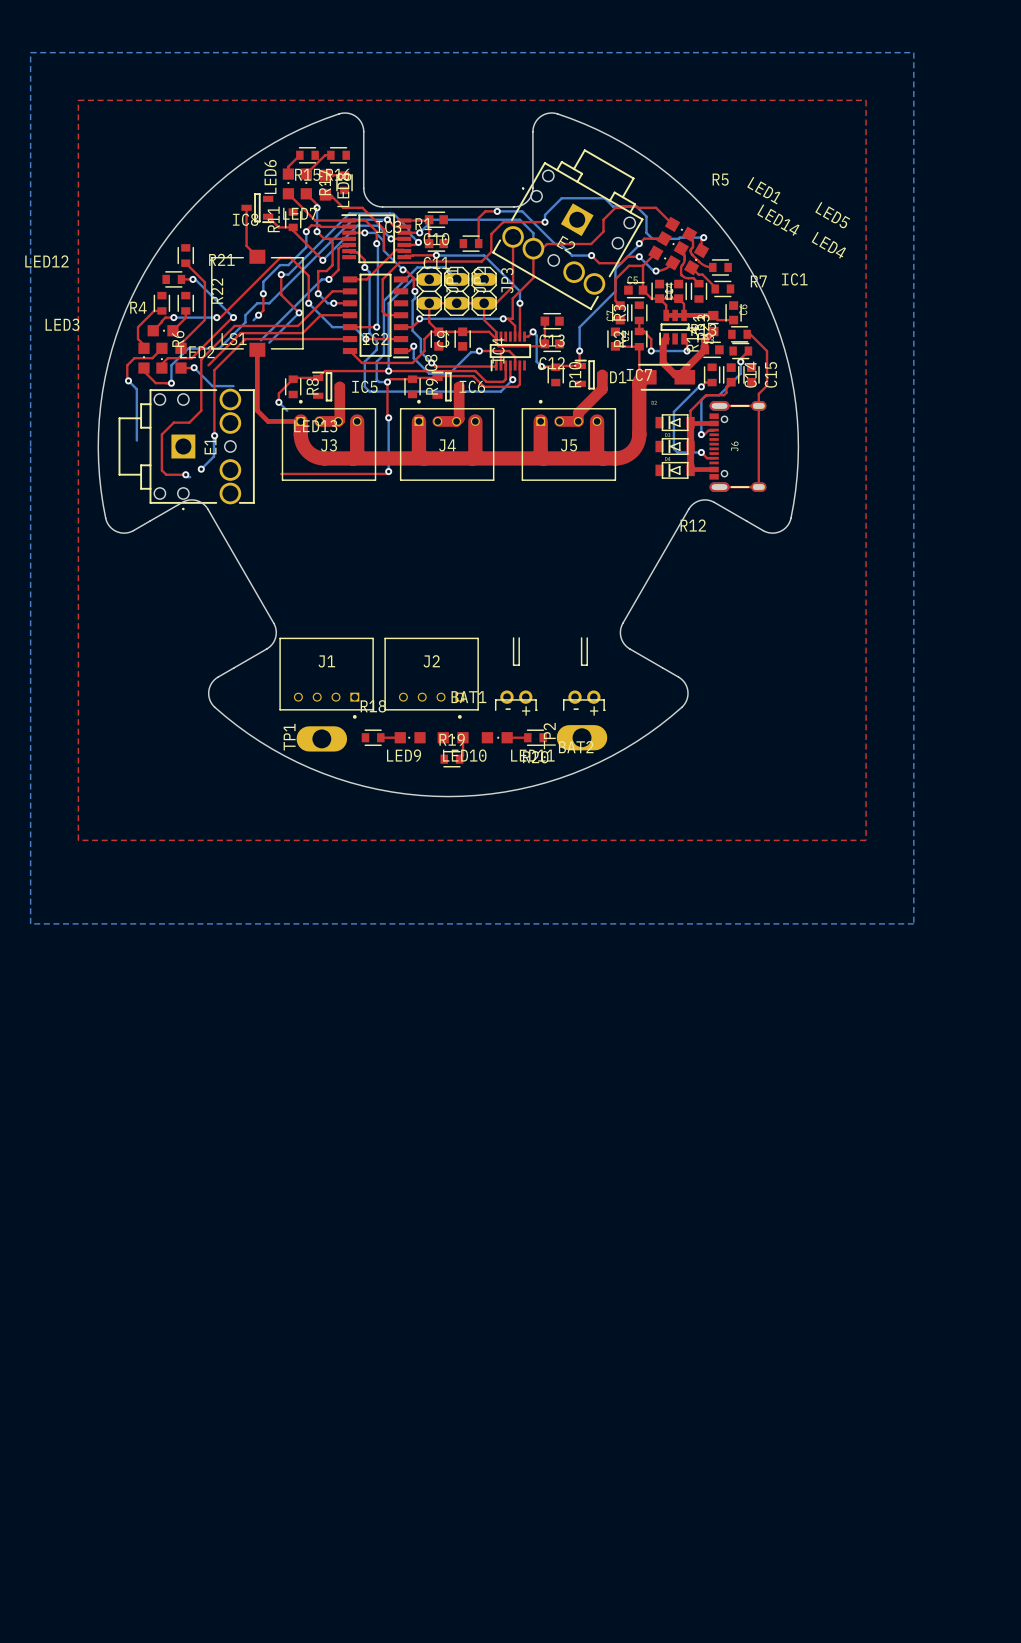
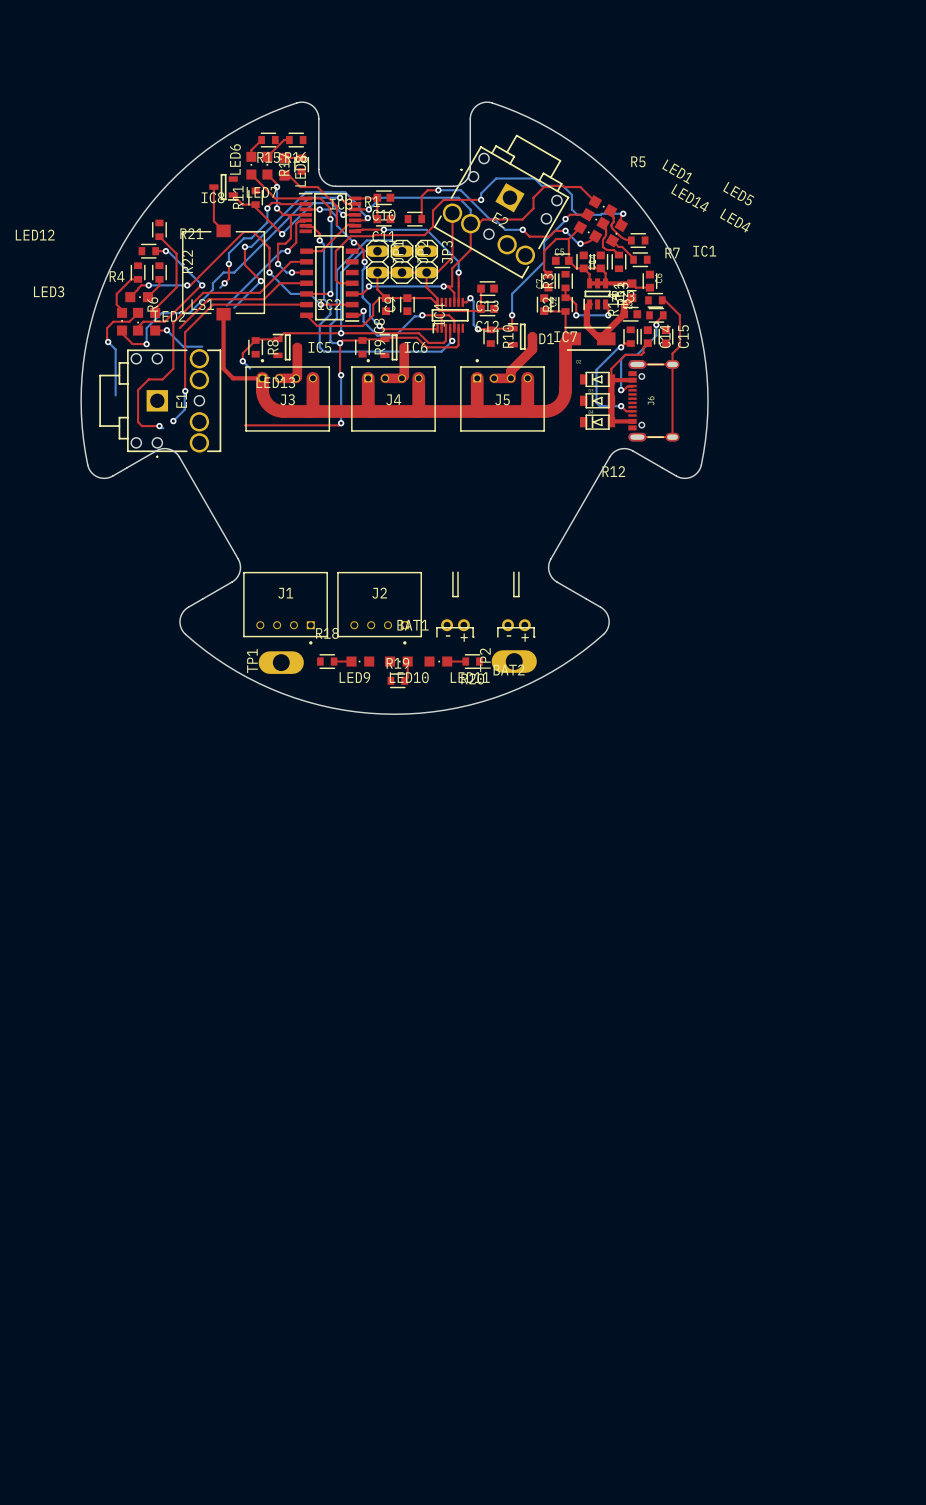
bottom zone outline: (30, 52) (30, 923) (913, 923) (913, 52) (30, 52) -> none
top zone outline: (78, 100) (78, 840) (866, 840) (866, 100) (78, 100) -> none

